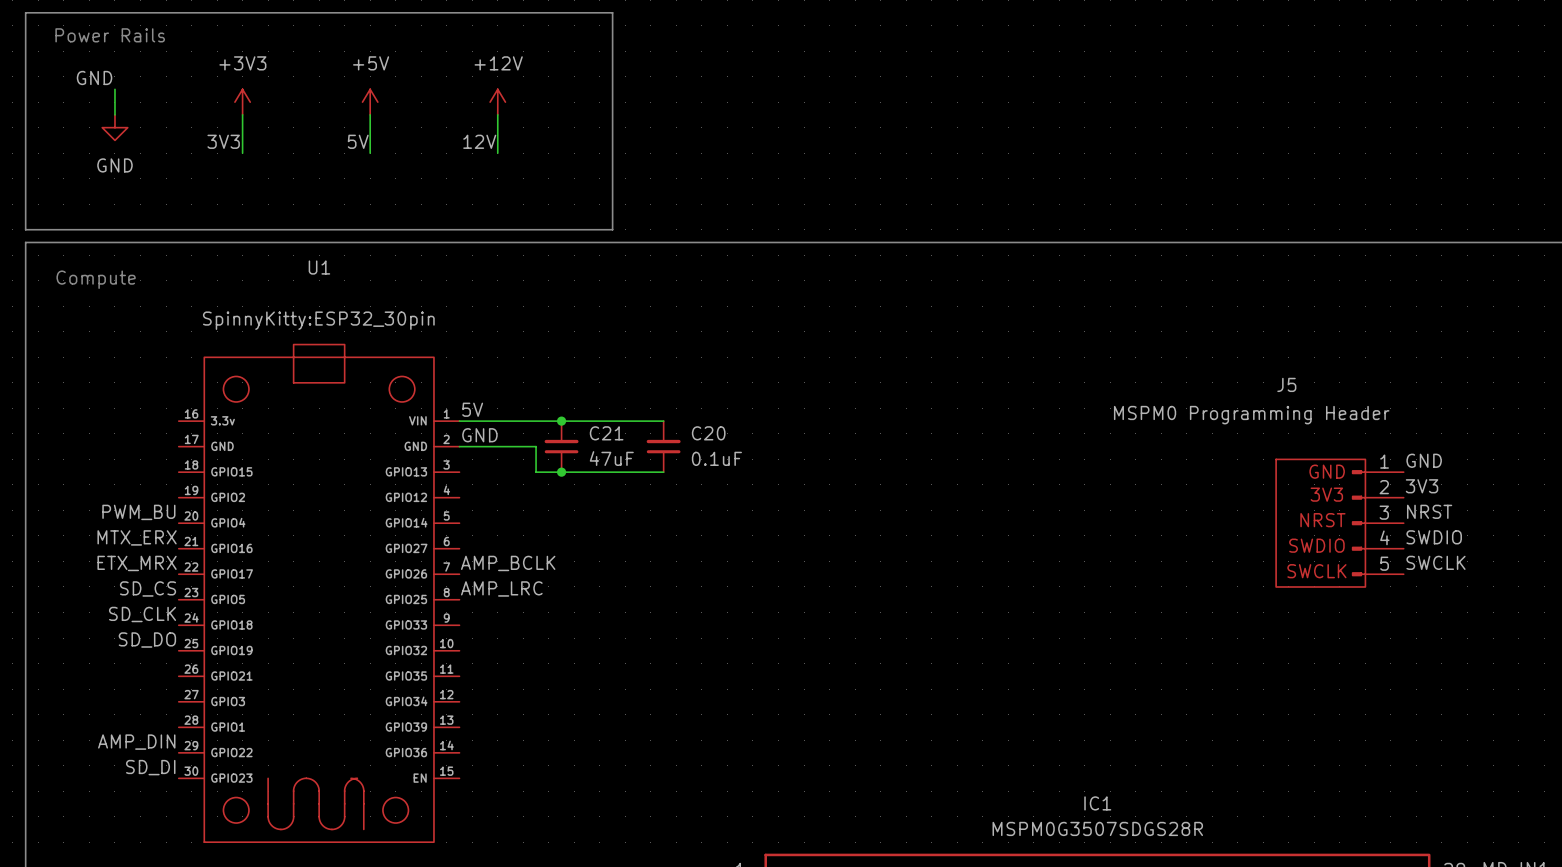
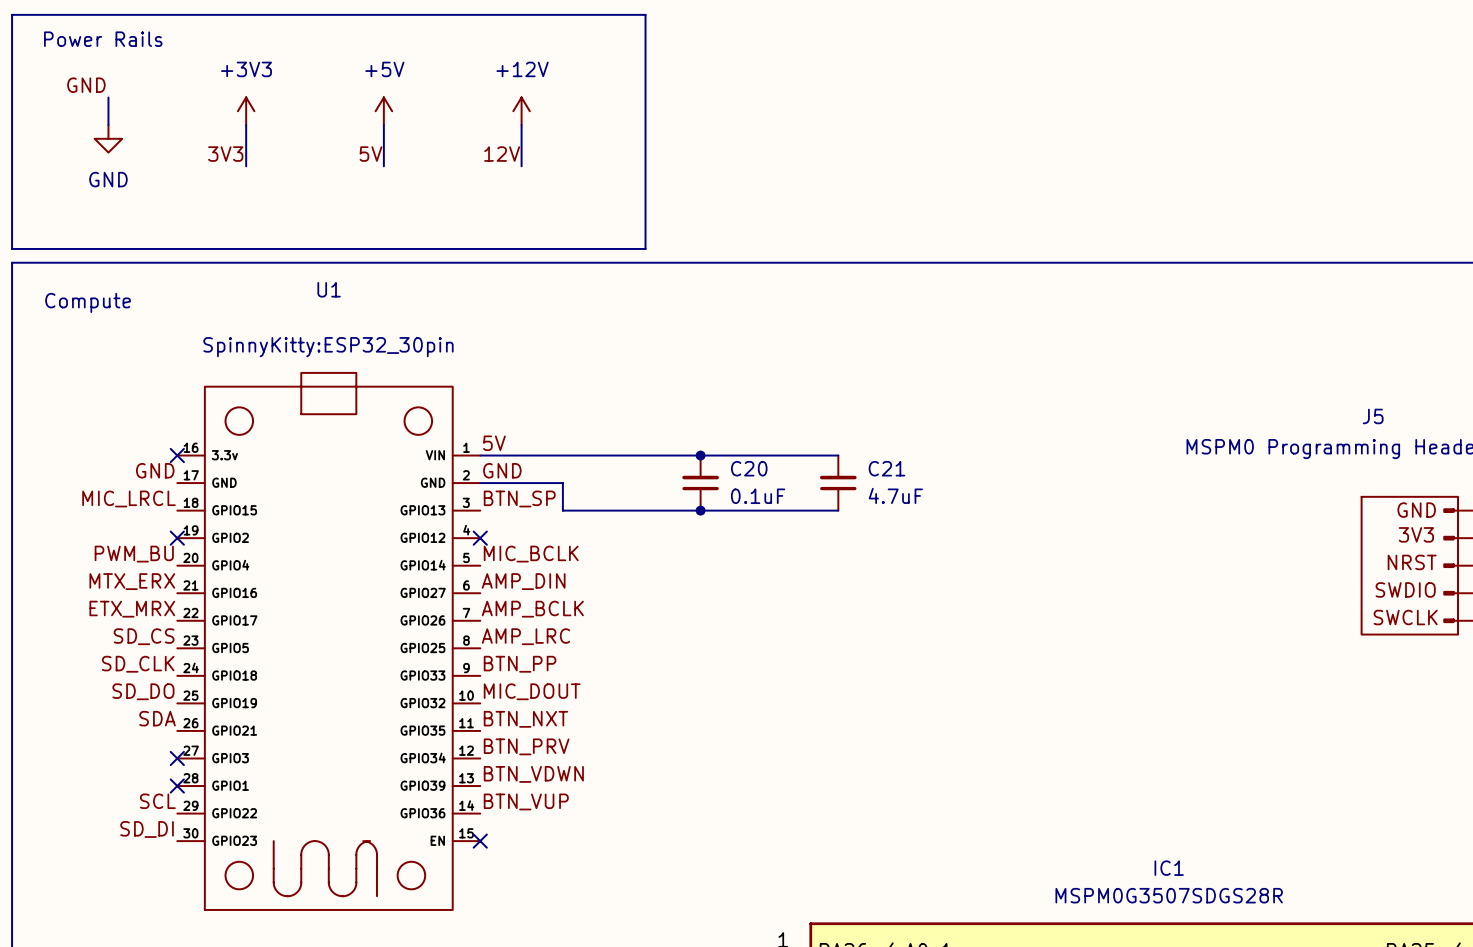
no-connect mark: none -> (177, 455)
junction: (561, 421) -> none
wire: none -> (700, 455) (838, 455)
junction: none -> (700, 455)
label: none -> GND (155, 470)
C21 position: (561, 446) -> (838, 483)
C21 value: 47uF (611, 458) -> 4.7uF (895, 495)
label: none -> MIC_LRCL (129, 498)
label: none -> BTN_SP (519, 498)
junction: (561, 472) -> none
wire: none -> (700, 510) (838, 510)
junction: none -> (700, 510)
no-connect mark: none -> (177, 538)
no-connect mark: none -> (480, 538)
label: none -> MIC_BCLK (531, 554)
label: none -> AMP_DIN (523, 581)
label: none -> BTN_PP (520, 664)
label: none -> MIC_DOUT (532, 691)
label: none -> SDA (157, 718)
label: none -> BTN_NXT (525, 719)
label: none -> BTN_PRV (526, 746)
no-connect mark: none -> (177, 758)
label: none -> BTN_VDWN (533, 774)
no-connect mark: none -> (177, 786)
label: AMP_DIN (136, 742) -> SCL (157, 801)
label: none -> BTN_VUP (526, 801)
no-connect mark: none -> (480, 841)

